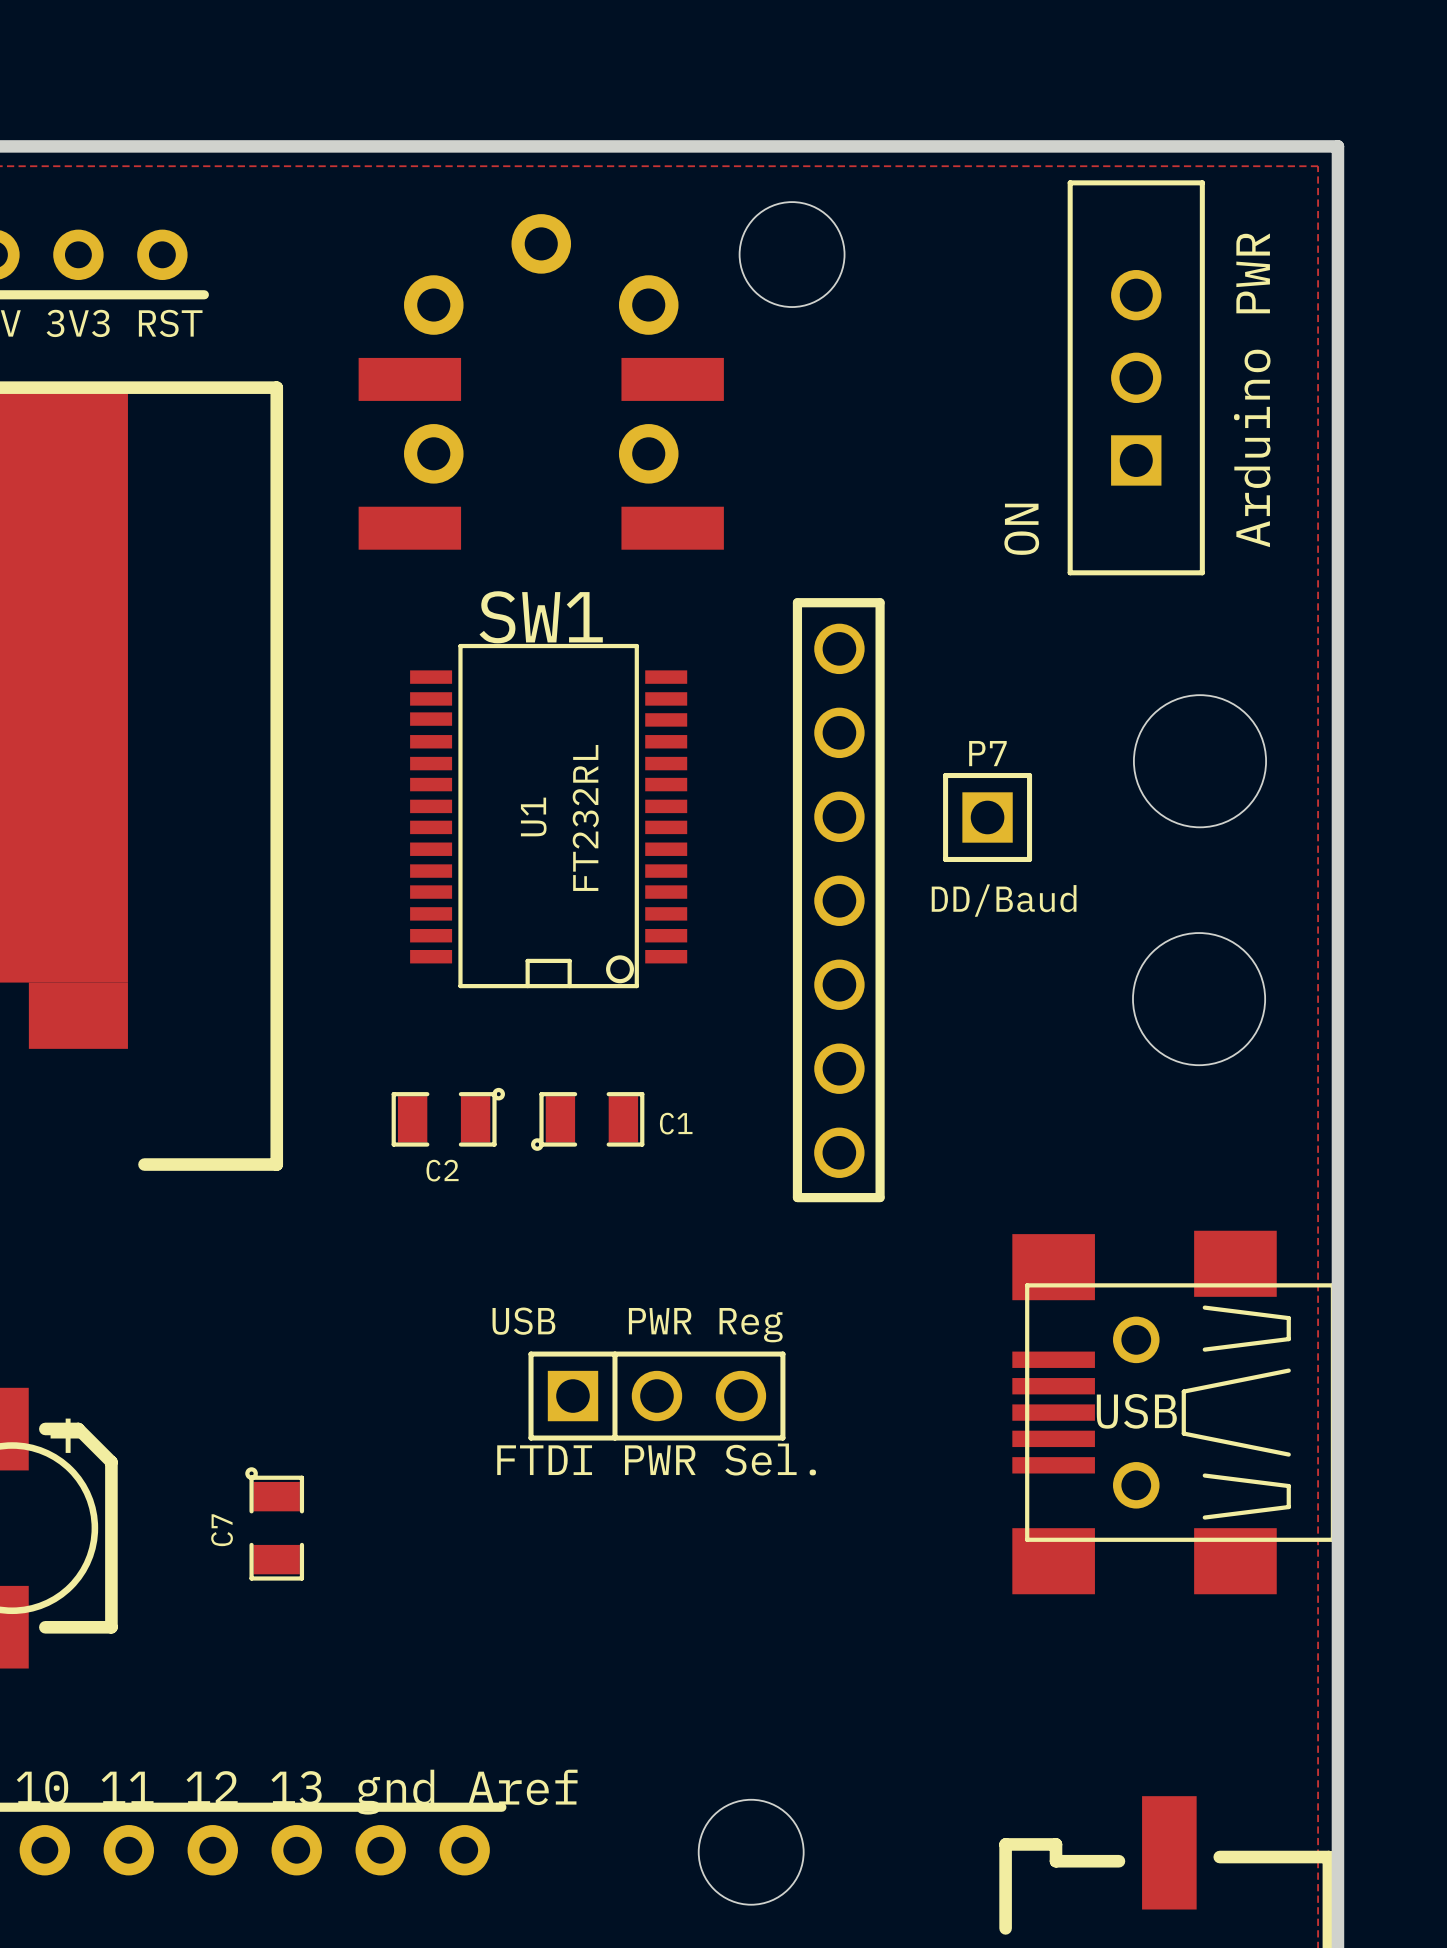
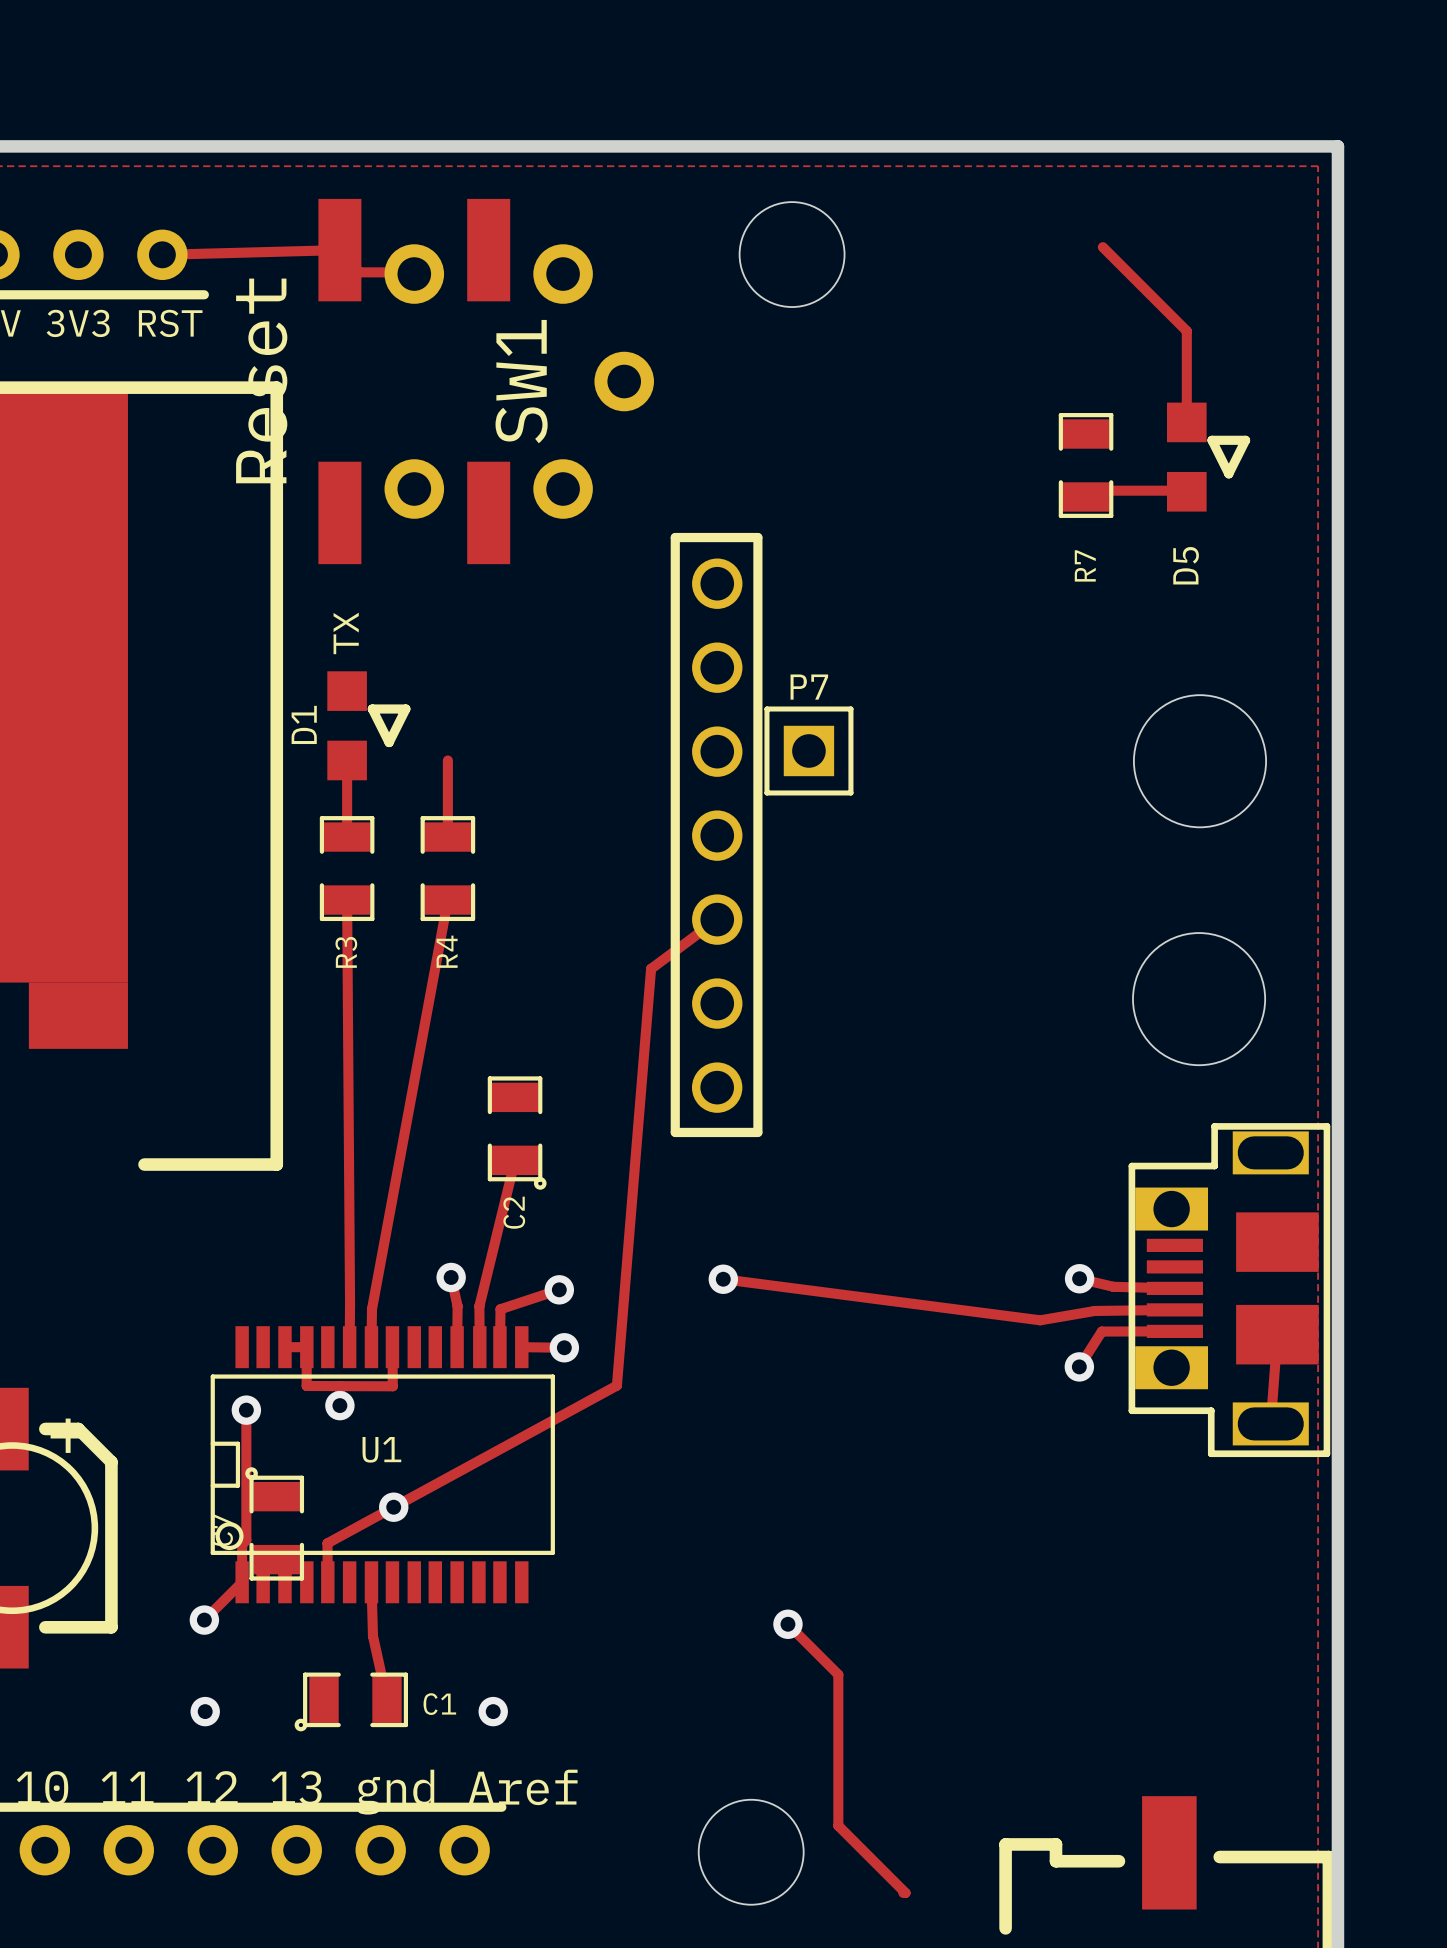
SW1 footprint: [358, 214, 724, 550] -> [318, 198, 654, 565]
track: none -> (1102, 247) (1186, 331) (1186, 422)
track: none -> (162, 254) (339, 250) (338, 251) (359, 272) (414, 272) (414, 274)
Arduino PWR: ON (1136, 377) -> none
D5: none -> (1208, 457)
R7: none -> (1086, 465)
track: none -> (1186, 491) (1094, 490) (1086, 499) (1086, 496)
SW1 name position: SW1 (541, 617) -> SW1 (521, 381)
D1: none -> (368, 725)
track: none -> (347, 760) (347, 837)
track: none -> (447, 760) (447, 837)
U1 rotation: 0° (548, 816) -> 90° clockwise (382, 1464)
U1 position: (548, 816) -> (382, 1464)
U1 value: FT232RL (585, 817) -> none
P7 position: (987, 817) -> (808, 750)
R3: none -> (347, 868)
R4: none -> (447, 868)
track: none -> (347, 900) (349, 1347)
track: none -> (447, 900) (371, 1309) (371, 1347)
part position: (838, 900) -> (716, 835)
P7 value: DD/Baud (1004, 900) -> none
track: none -> (717, 919) (651, 968) (616, 1385) (327, 1543) (327, 1582)
C2 rotation: 0° (448, 1117) -> 90° clockwise (517, 1133)
C2 position: (448, 1117) -> (517, 1133)
C1 position: (587, 1121) -> (351, 1701)
track: none -> (515, 1160) (479, 1306) (479, 1347)
track: none -> (451, 1277) (457, 1306) (457, 1347)
via: none -> (451, 1277)
track: none -> (1079, 1278) (1113, 1286) (1174, 1288)
via: none -> (1079, 1278)
track: none -> (723, 1279) (1040, 1320) (1094, 1310) (1174, 1309)
via: none -> (723, 1279)
track: none -> (559, 1289) (500, 1309) (499, 1347)
via: none -> (559, 1289)
part: none -> (1229, 1290)
track: none -> (1174, 1331) (1101, 1331) (1079, 1366)
track: none -> (1277, 1334) (1270, 1423)
track: none -> (284, 1347) (306, 1347) (306, 1385) (340, 1386)
track: none -> (392, 1347) (392, 1386) (340, 1386)
track: none -> (521, 1347) (564, 1347)
via: none -> (564, 1347)
via: none -> (1079, 1366)
USB PWR Reg: FTDI PWR Sel. (656, 1396) -> none
via: none -> (339, 1405)
track: none -> (246, 1410) (246, 1540) (242, 1544) (242, 1582) (204, 1620)
via: none -> (246, 1410)
part: USB (1173, 1412) -> none
via: none -> (393, 1507)
track: none -> (371, 1582) (372, 1636) (387, 1699)
via: none -> (204, 1620)
track: none -> (787, 1624) (838, 1674) (838, 1825) (905, 1892) (903, 1892)
via: none -> (787, 1624)
via: none -> (205, 1711)
via: none -> (493, 1711)

